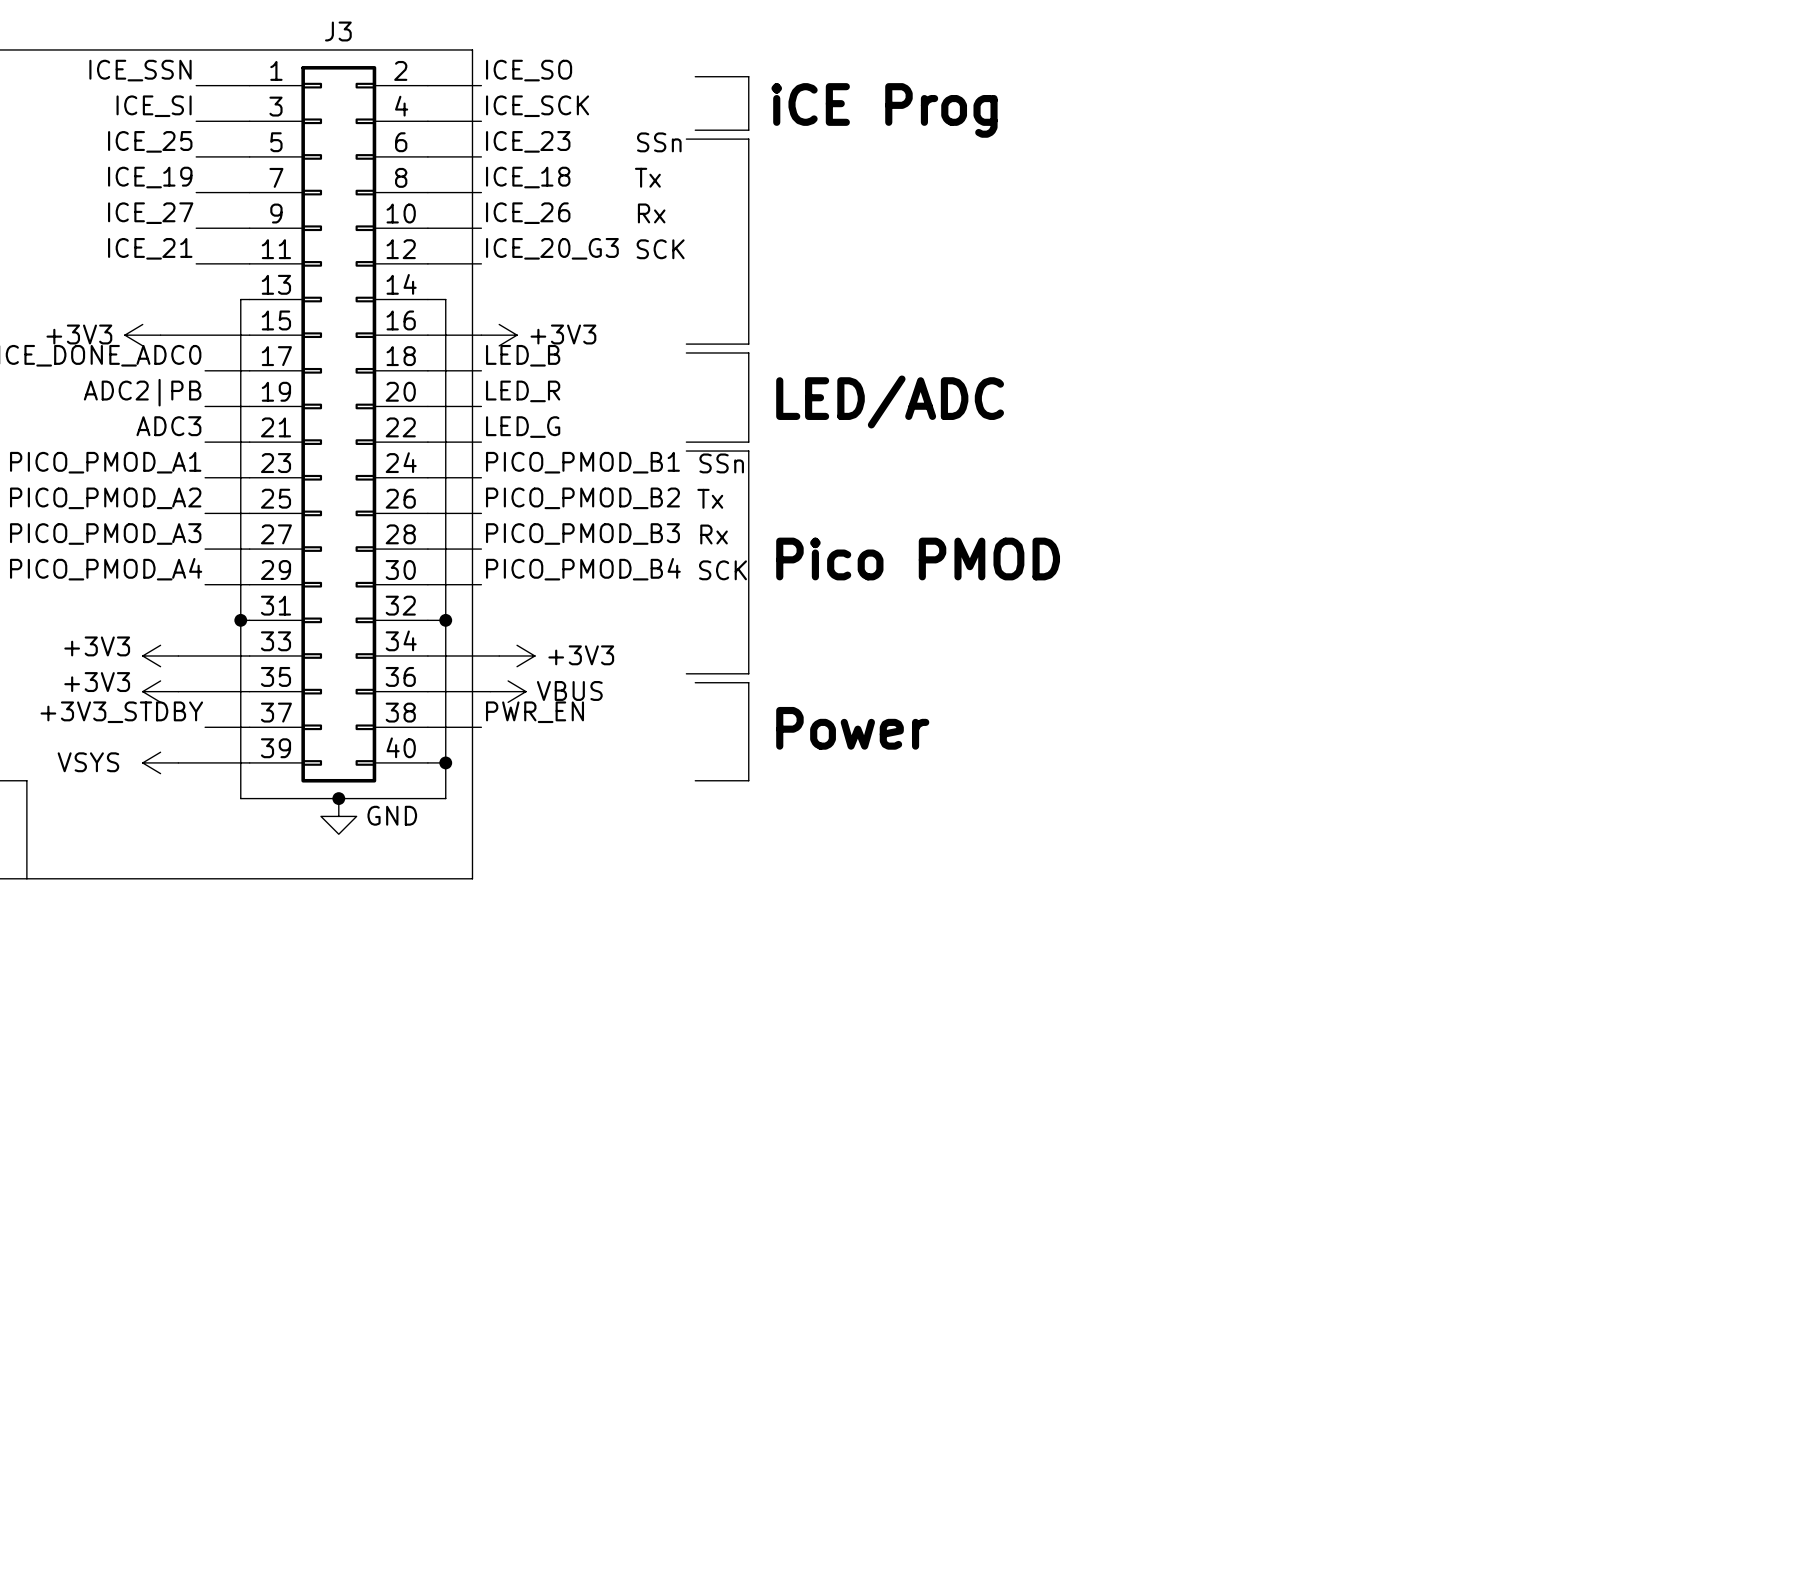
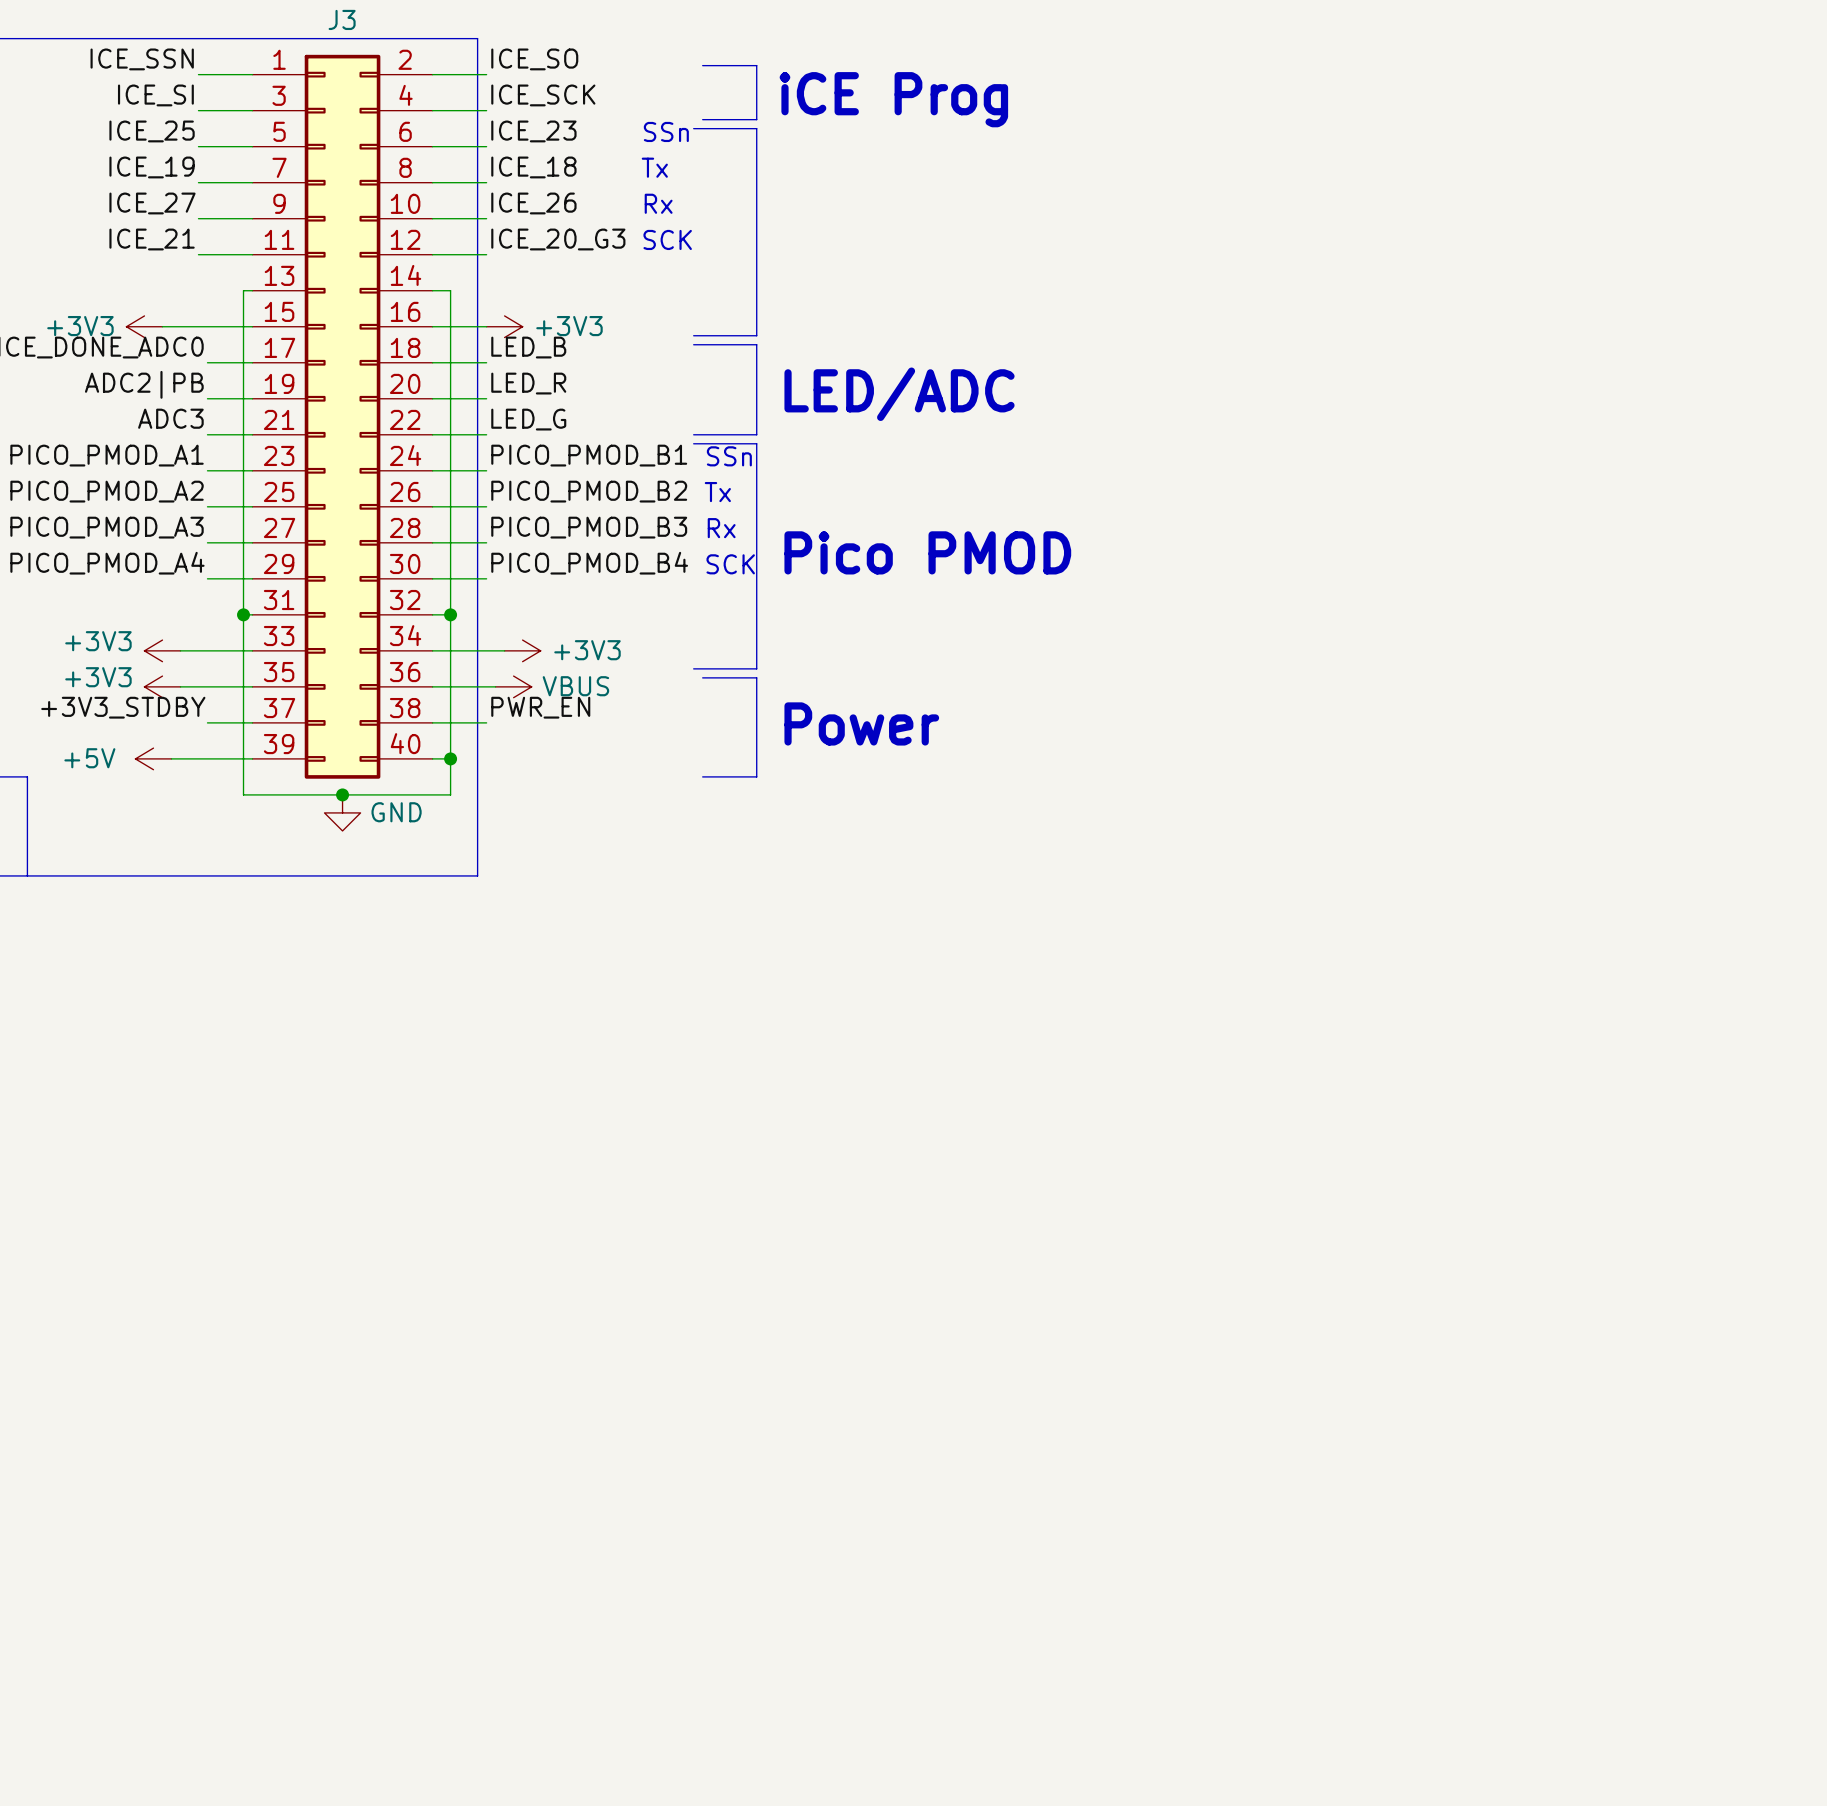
power symbol: VSYS (160, 762) -> +5V (153, 758)

